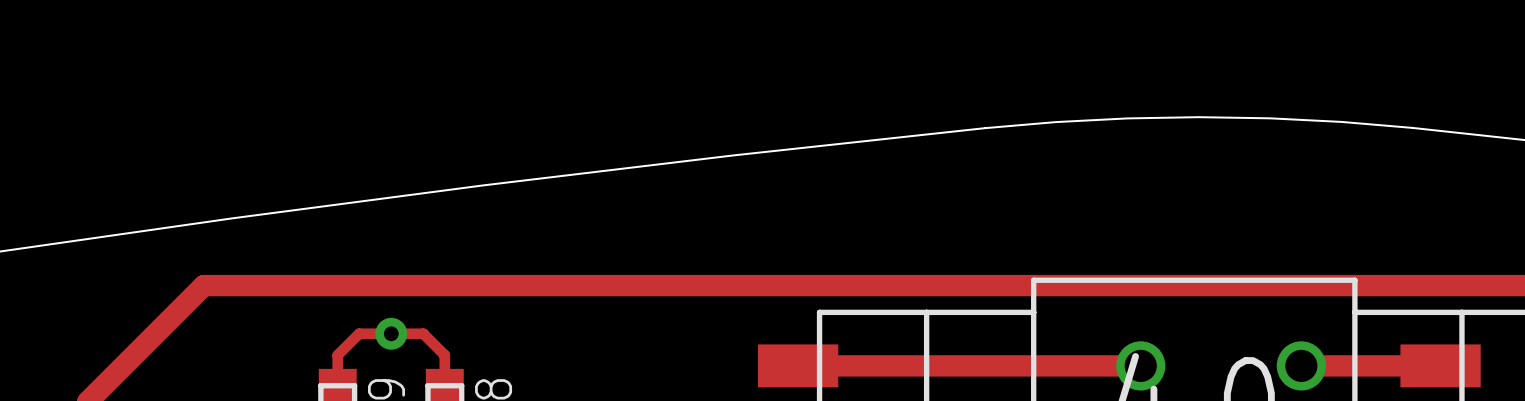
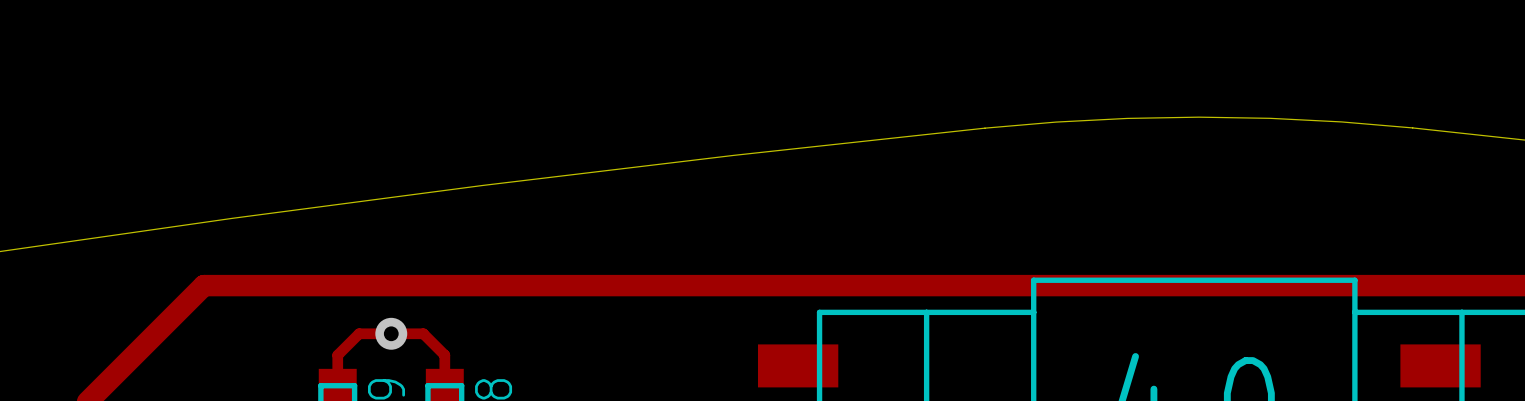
top track: (798, 365) (1140, 365) -> none
via: (1140, 365) -> none
top track: (1301, 365) (1440, 365) -> none
via: (1301, 365) -> none

